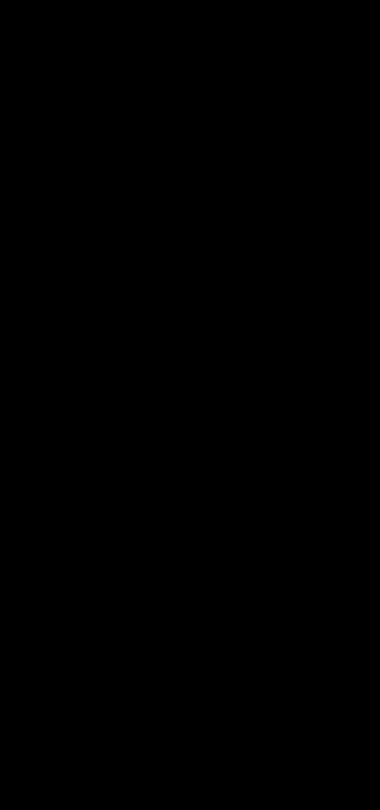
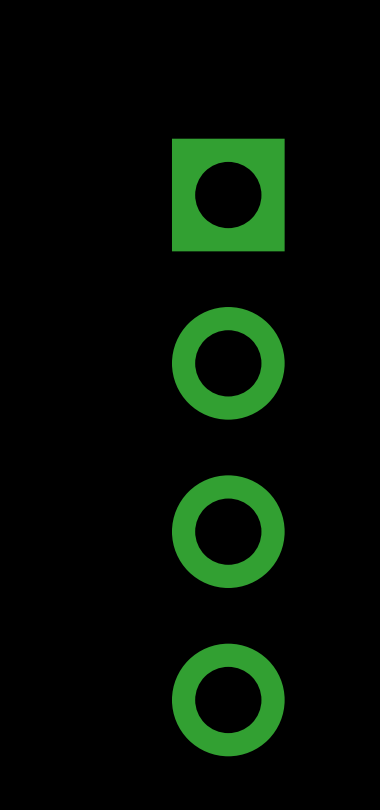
part: none -> (228, 447)

